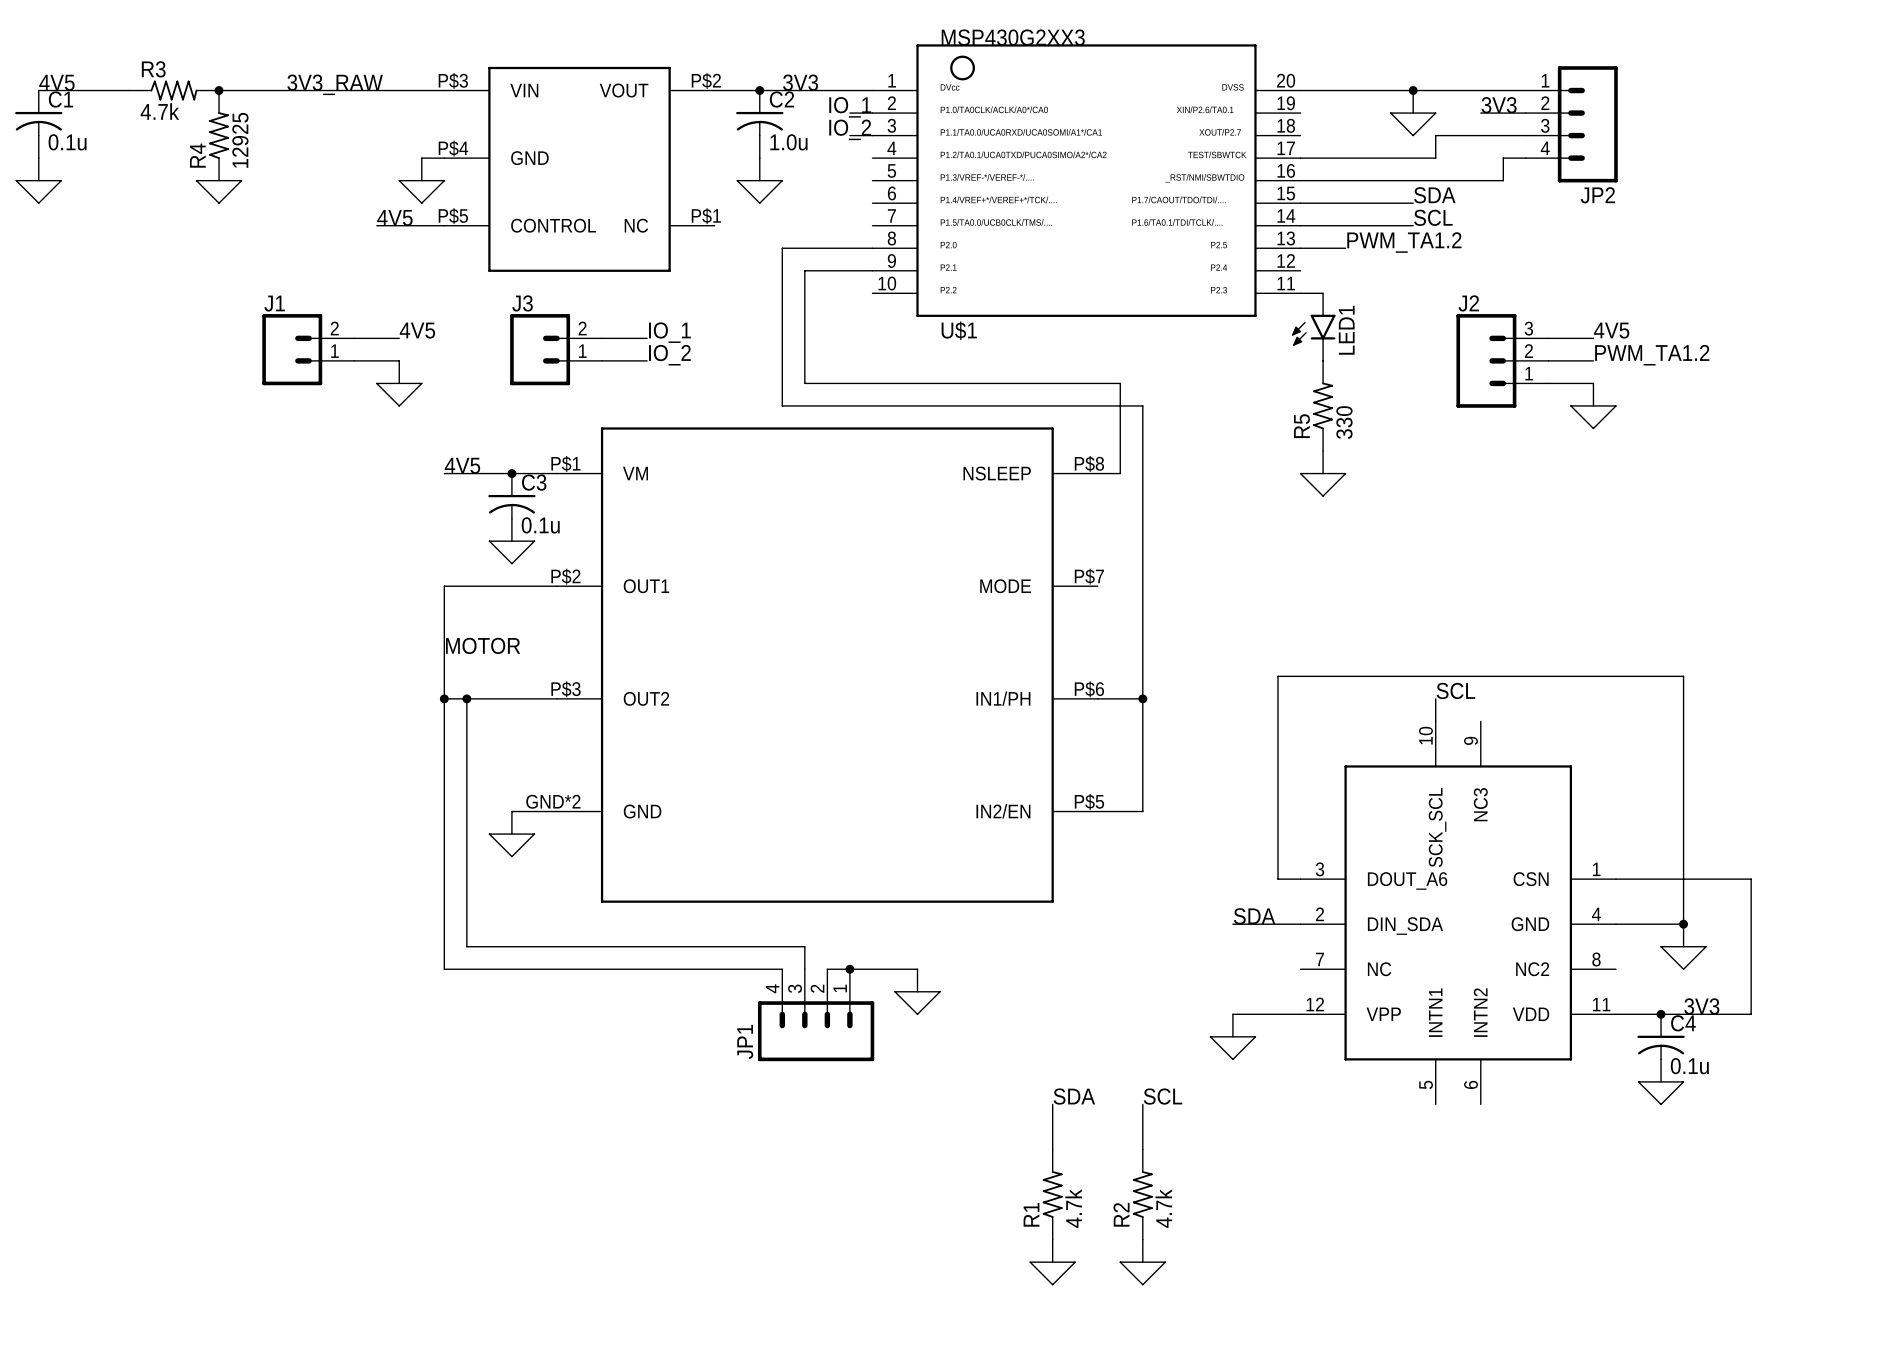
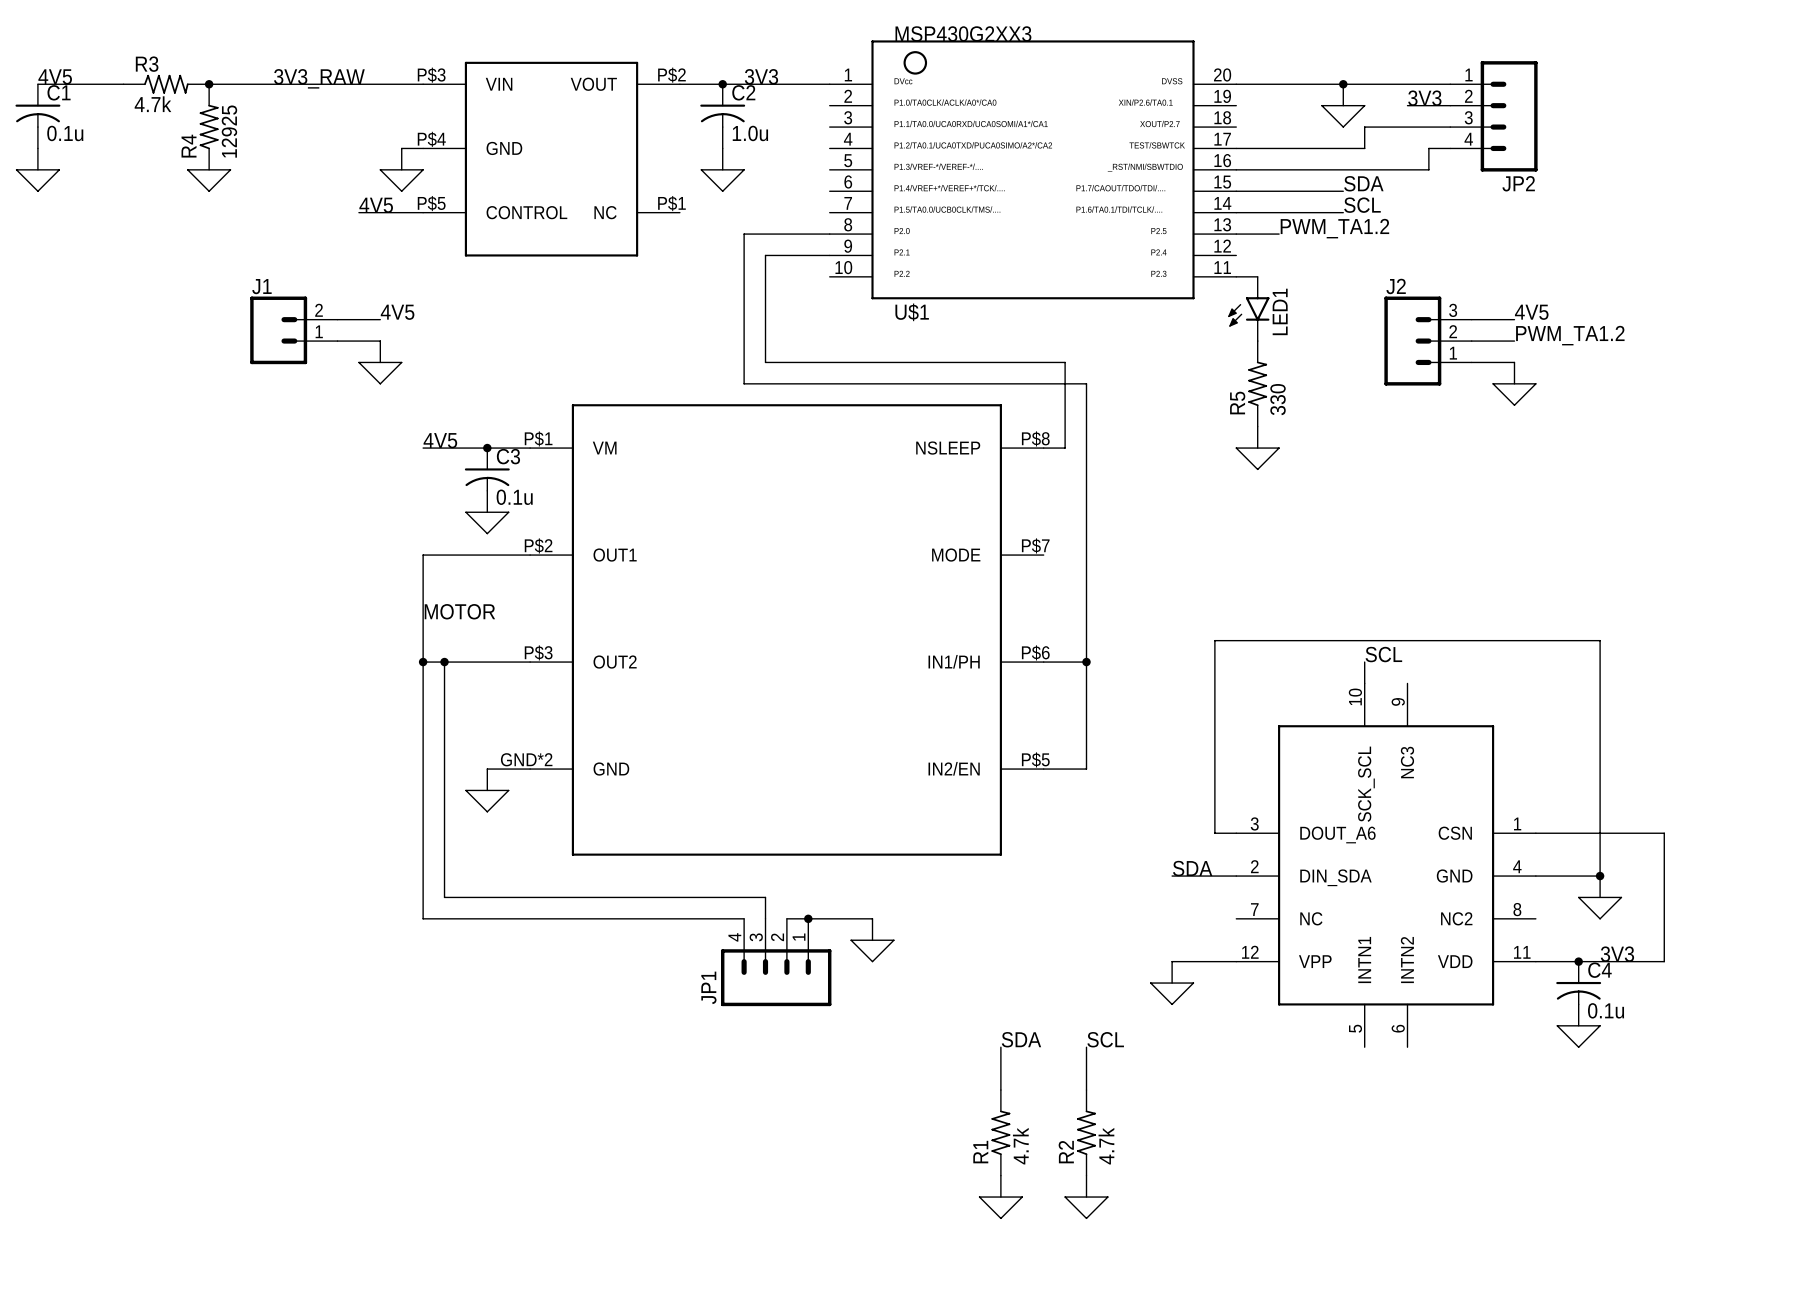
label: IO_1 (850, 107) -> none
wire: (849, 113) (872, 113) -> none
label: IO_2 (850, 129) -> none
wire: (849, 135) (872, 135) -> none
label: IO_1 (669, 332) -> none
wire: (602, 338) (647, 338) -> none
J3: (556, 349) -> none
label: IO_2 (669, 355) -> none
wire: (602, 360) (647, 360) -> none

